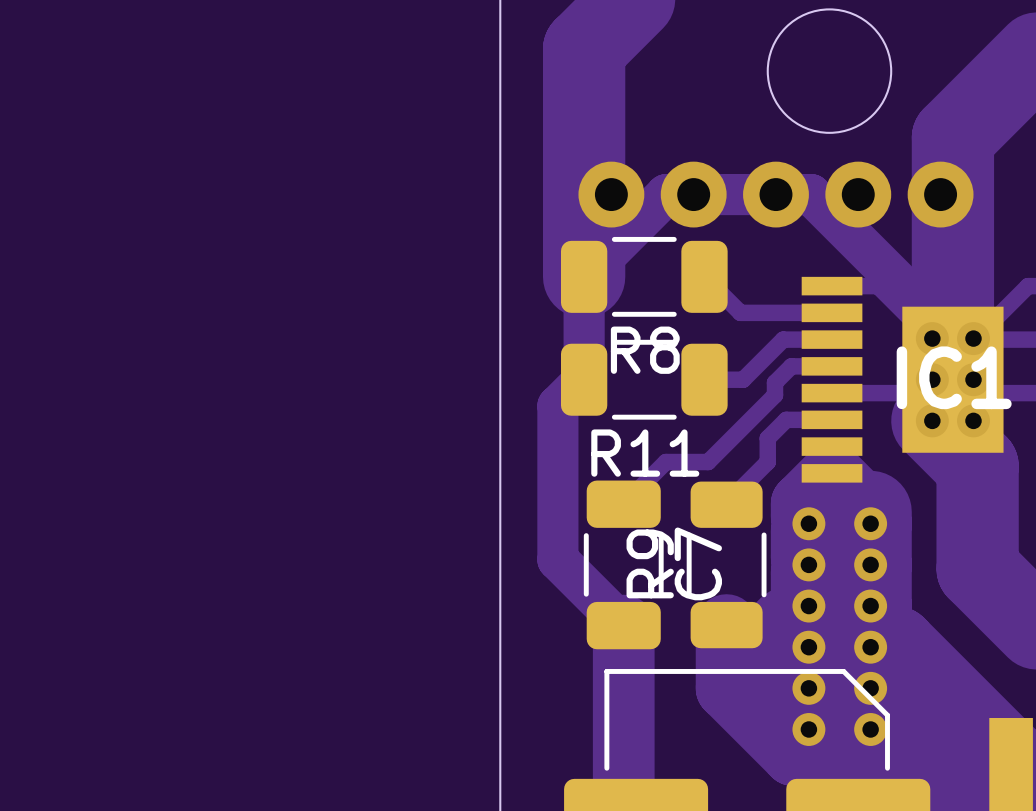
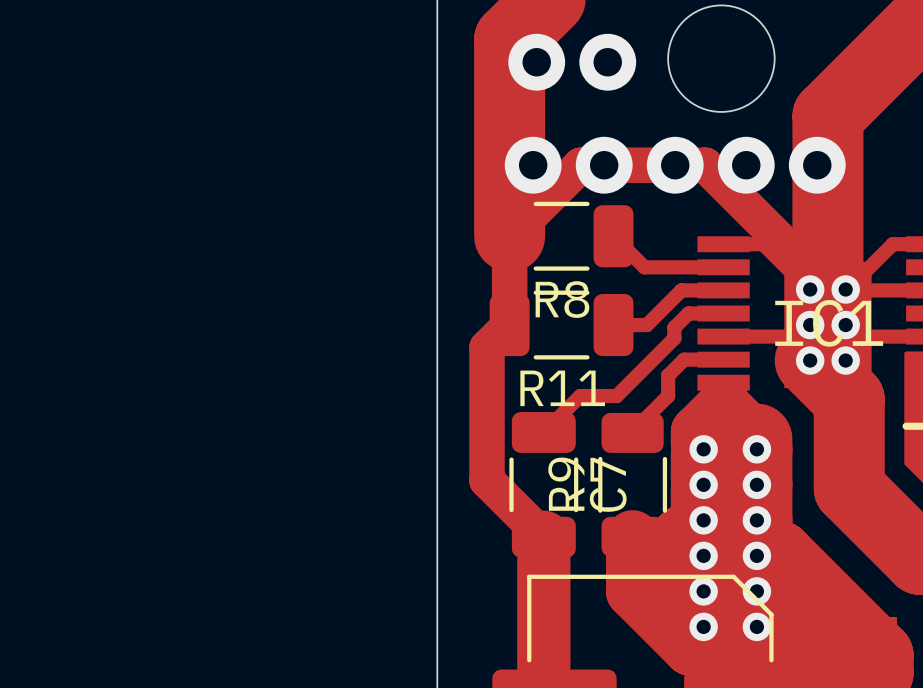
via: none -> (536, 62)
via: none -> (607, 62)

